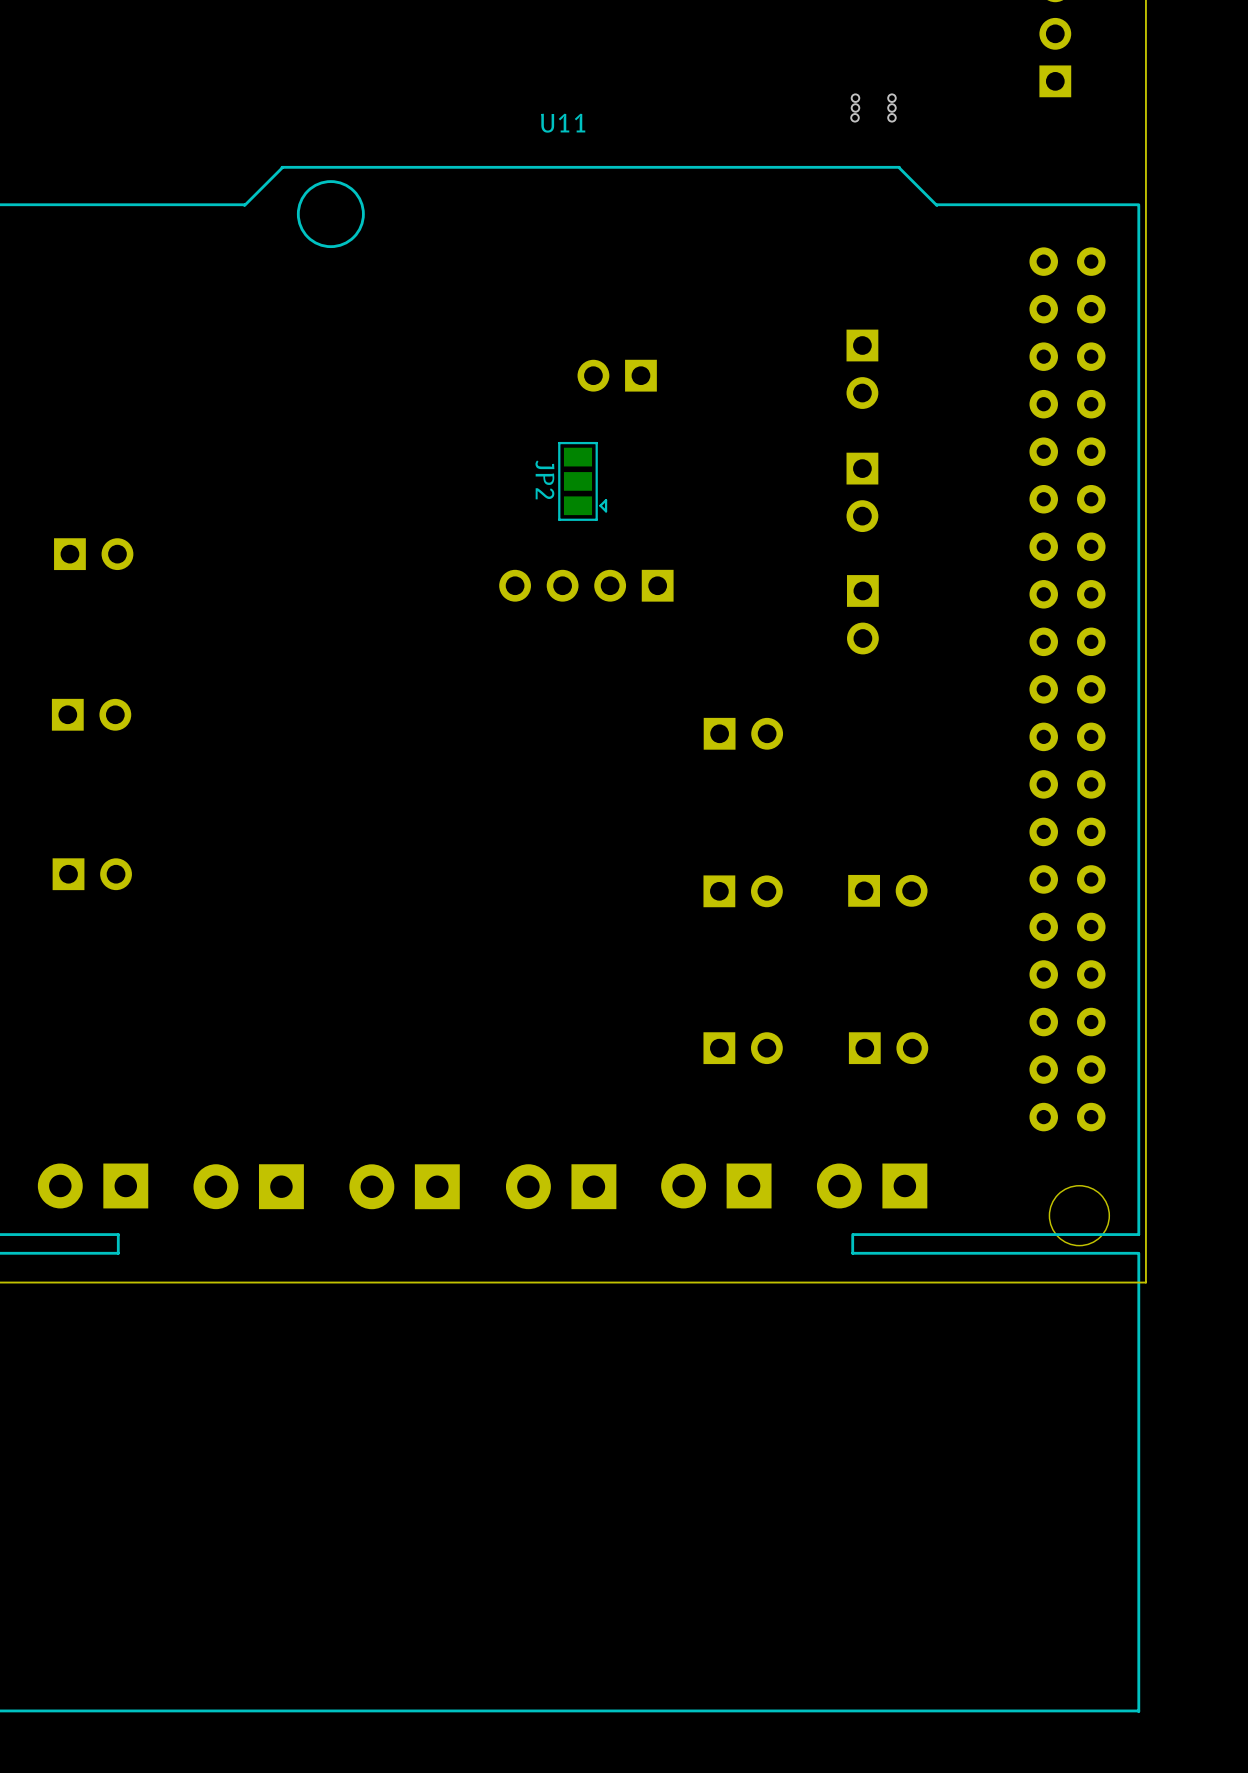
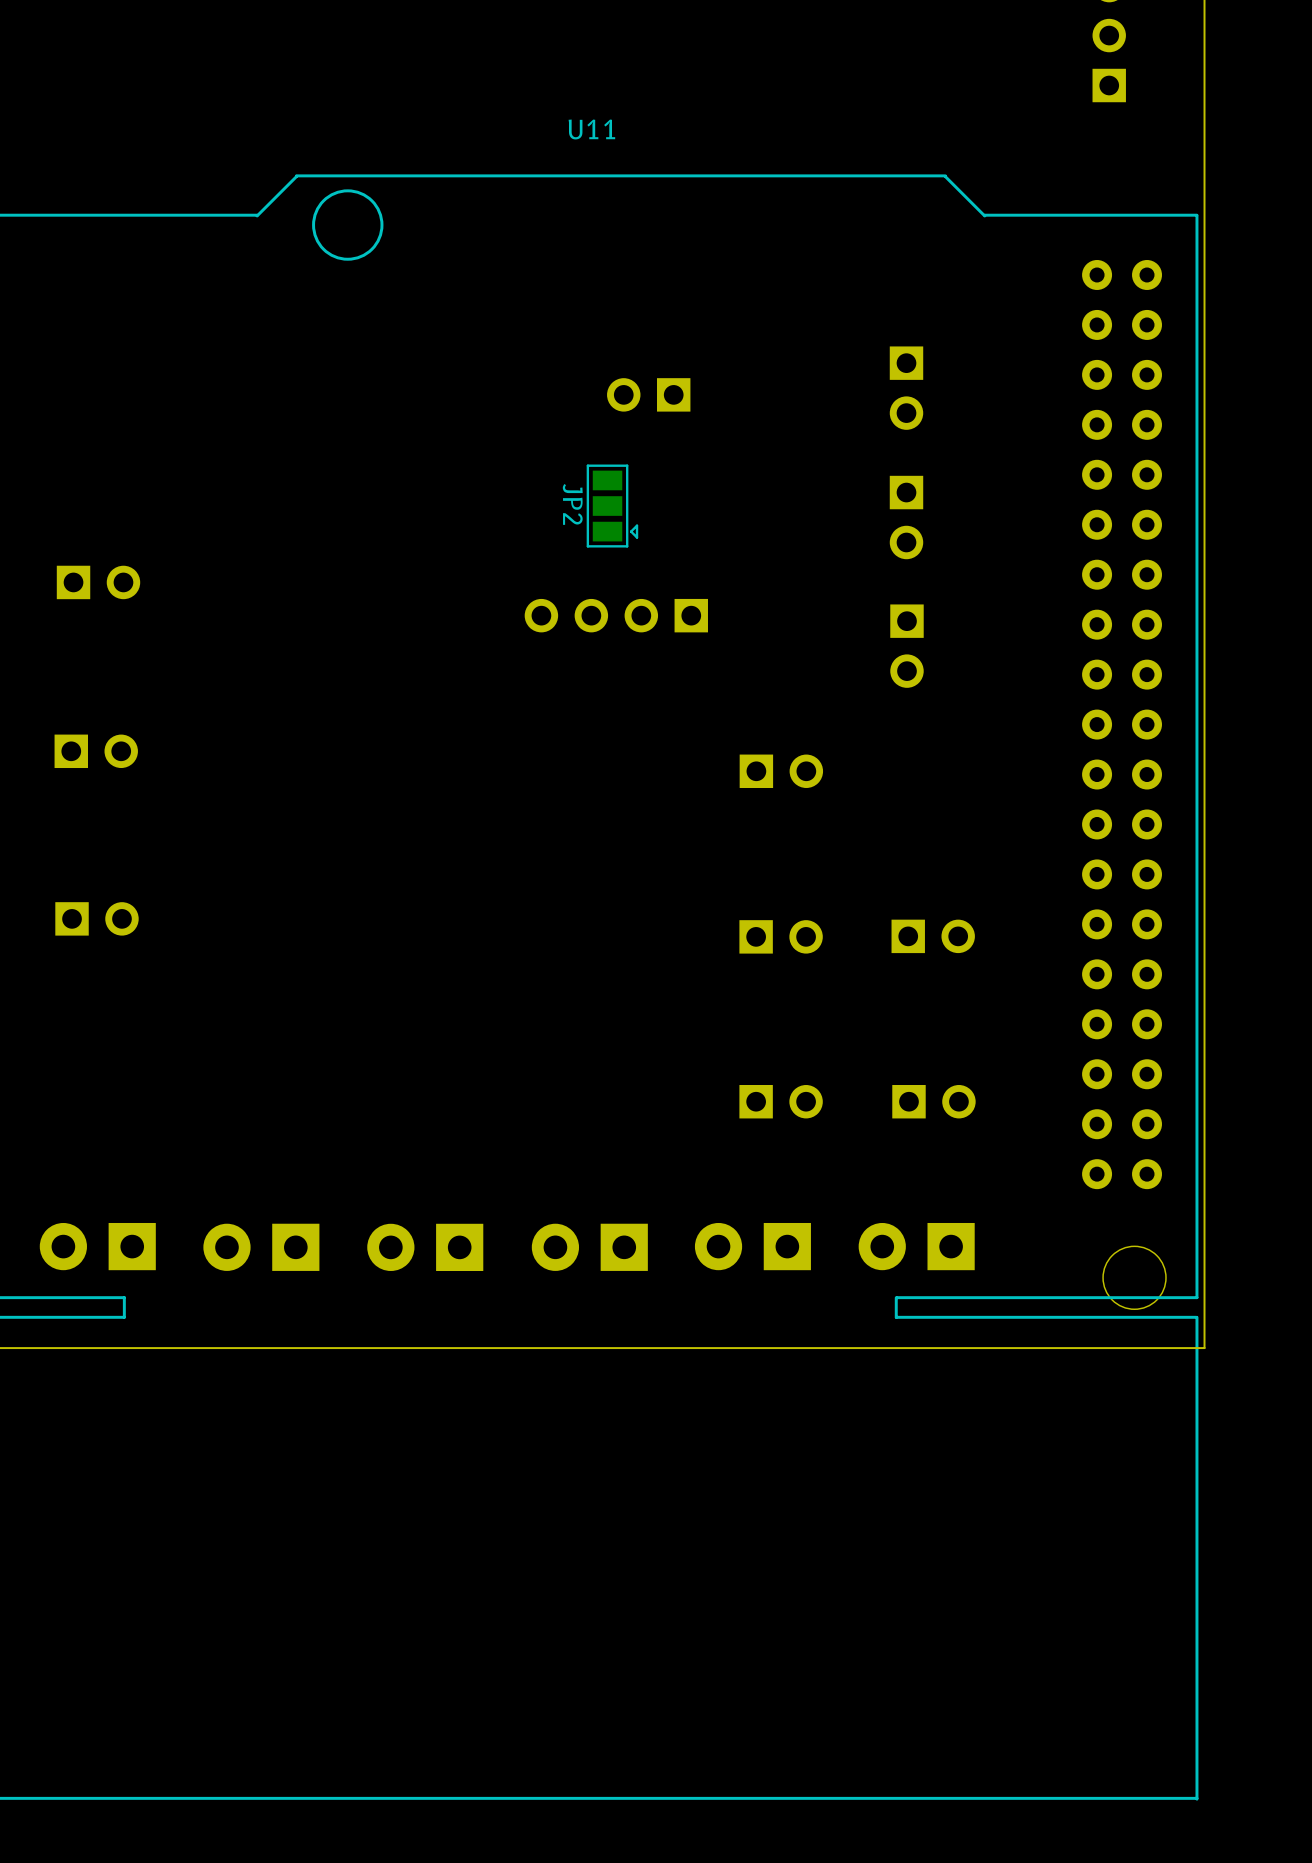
via: (855, 98) -> none
via: (891, 98) -> none
via: (855, 107) -> none
via: (891, 107) -> none
via: (855, 117) -> none
via: (891, 117) -> none

